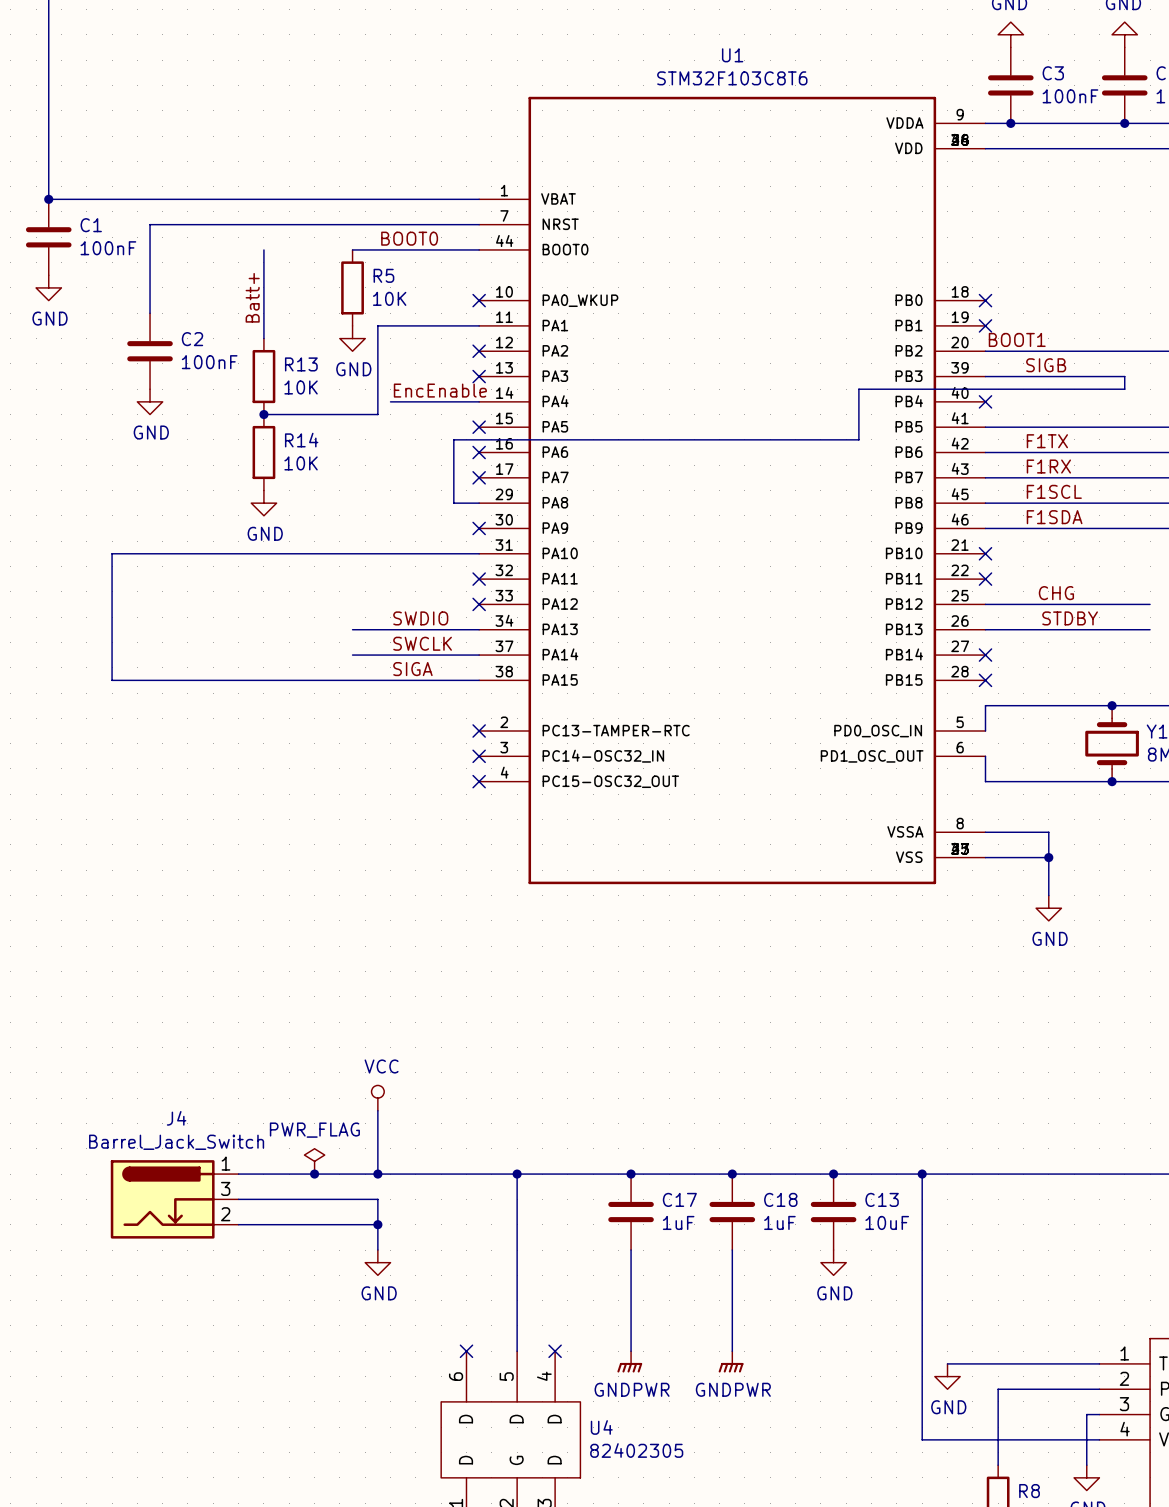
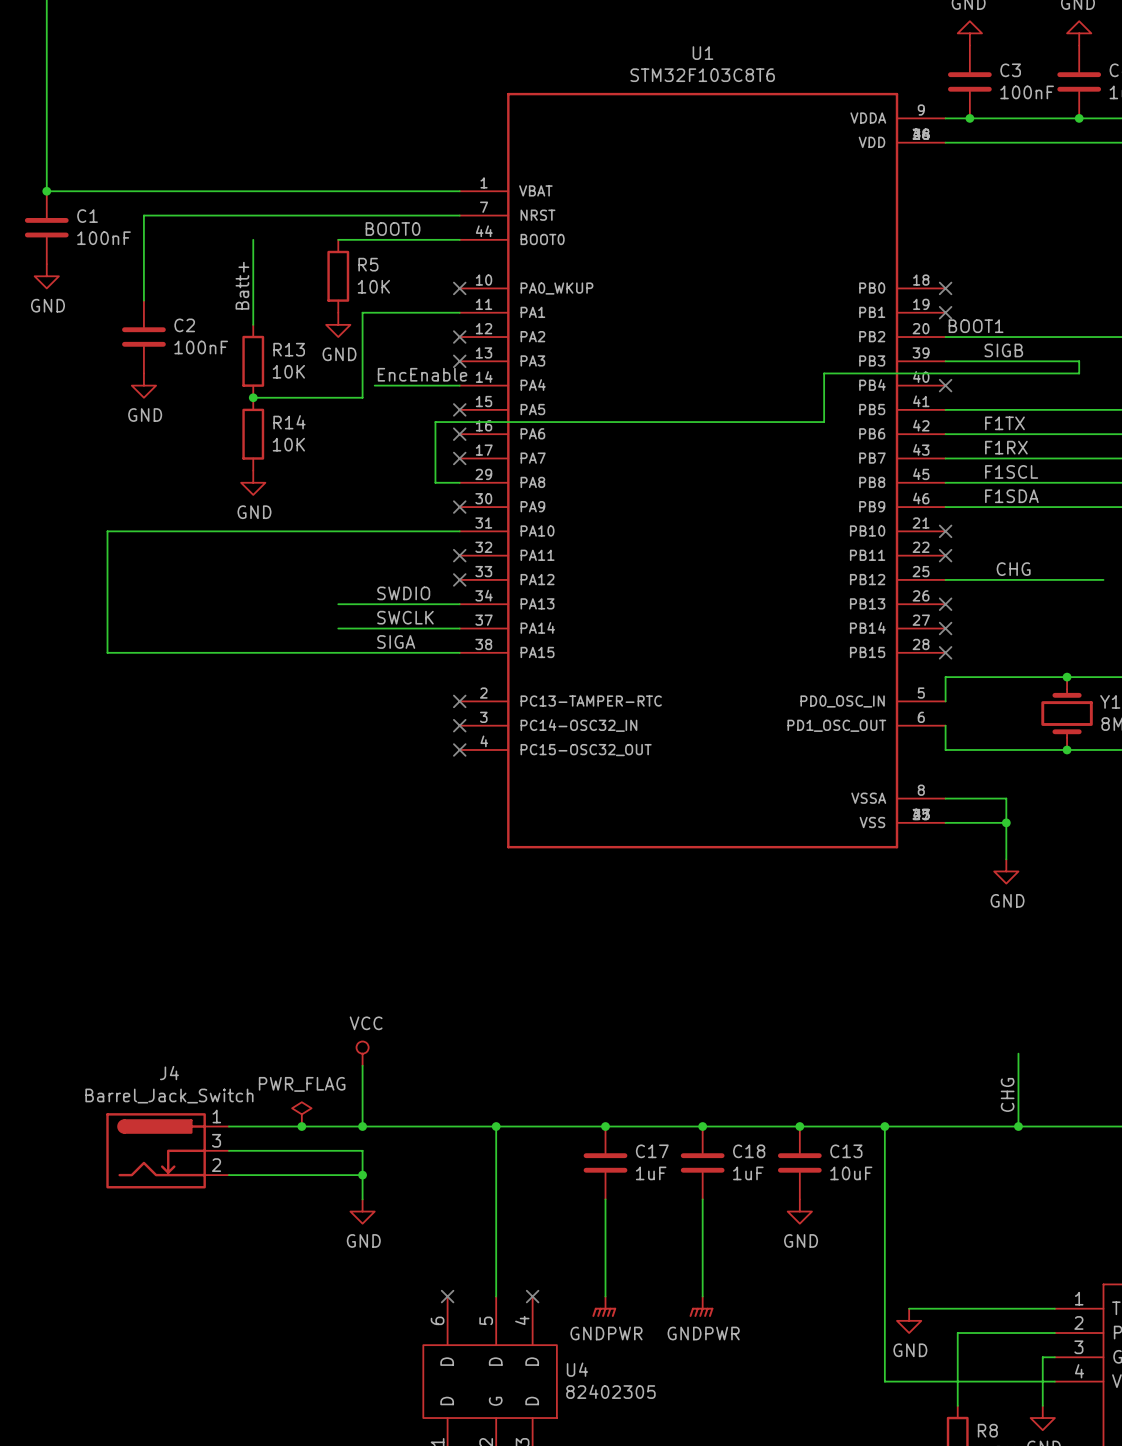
label: STDBY (1070, 618) -> none
wire: (985, 629) (1150, 629) -> none
no-connect mark: none -> (945, 604)
wire: none -> (1018, 1053) (1018, 1126)
label: none -> CHG (1007, 1094)
junction: none -> (1018, 1126)

